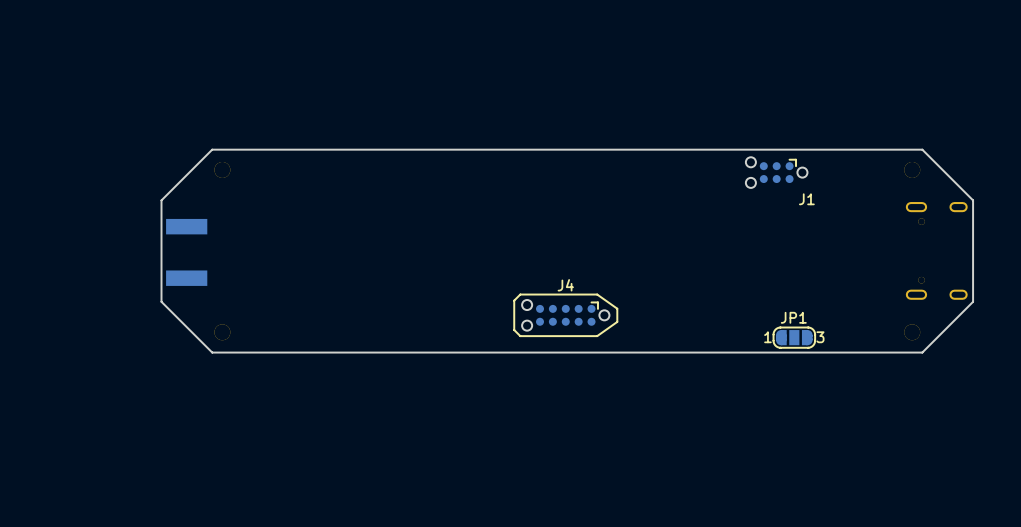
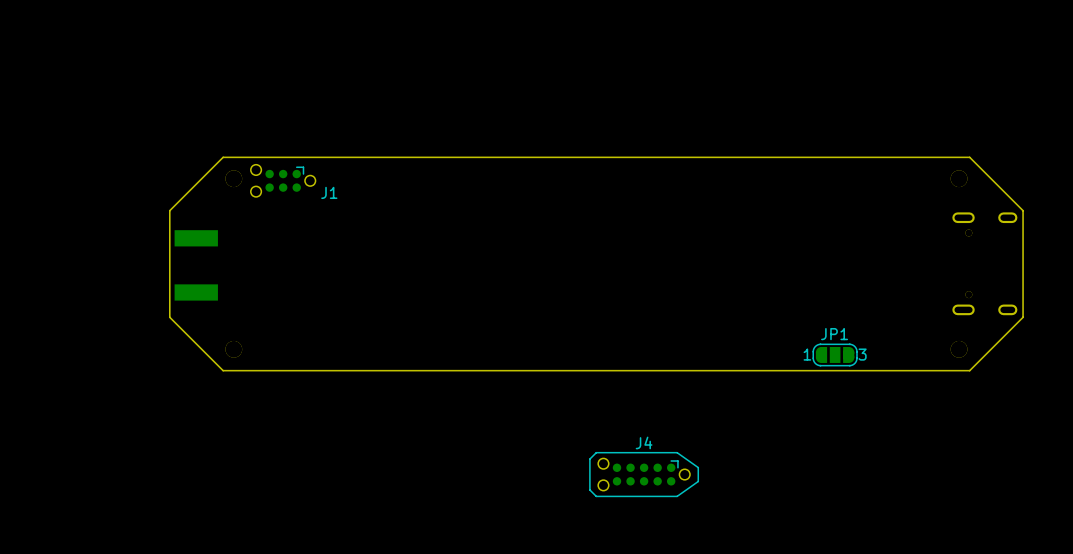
J1 position: (776, 172) -> (283, 180)
J1 name position: J1 (806, 199) -> J1 (329, 192)
J4 position: (565, 315) -> (644, 474)

